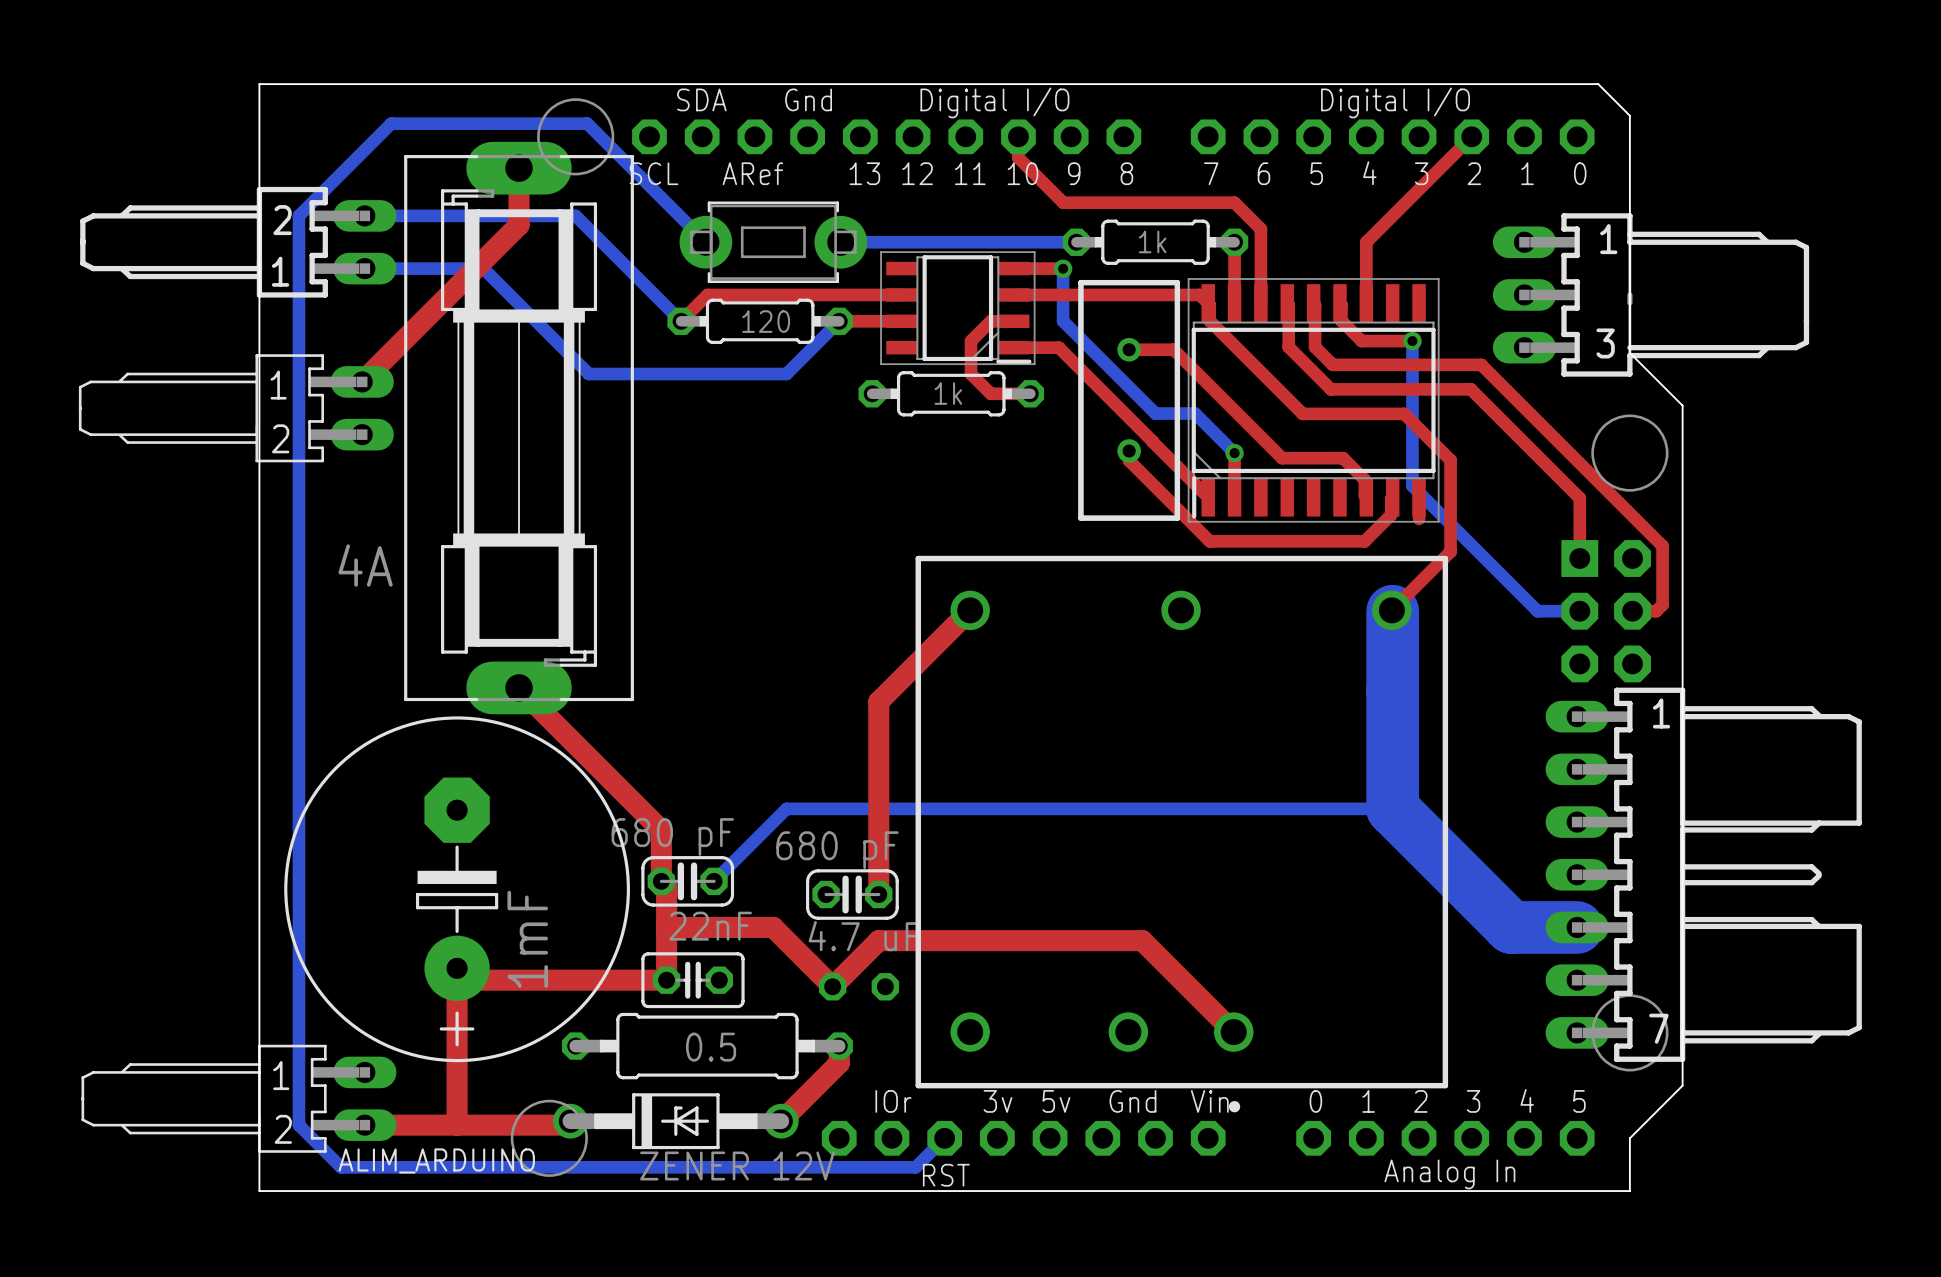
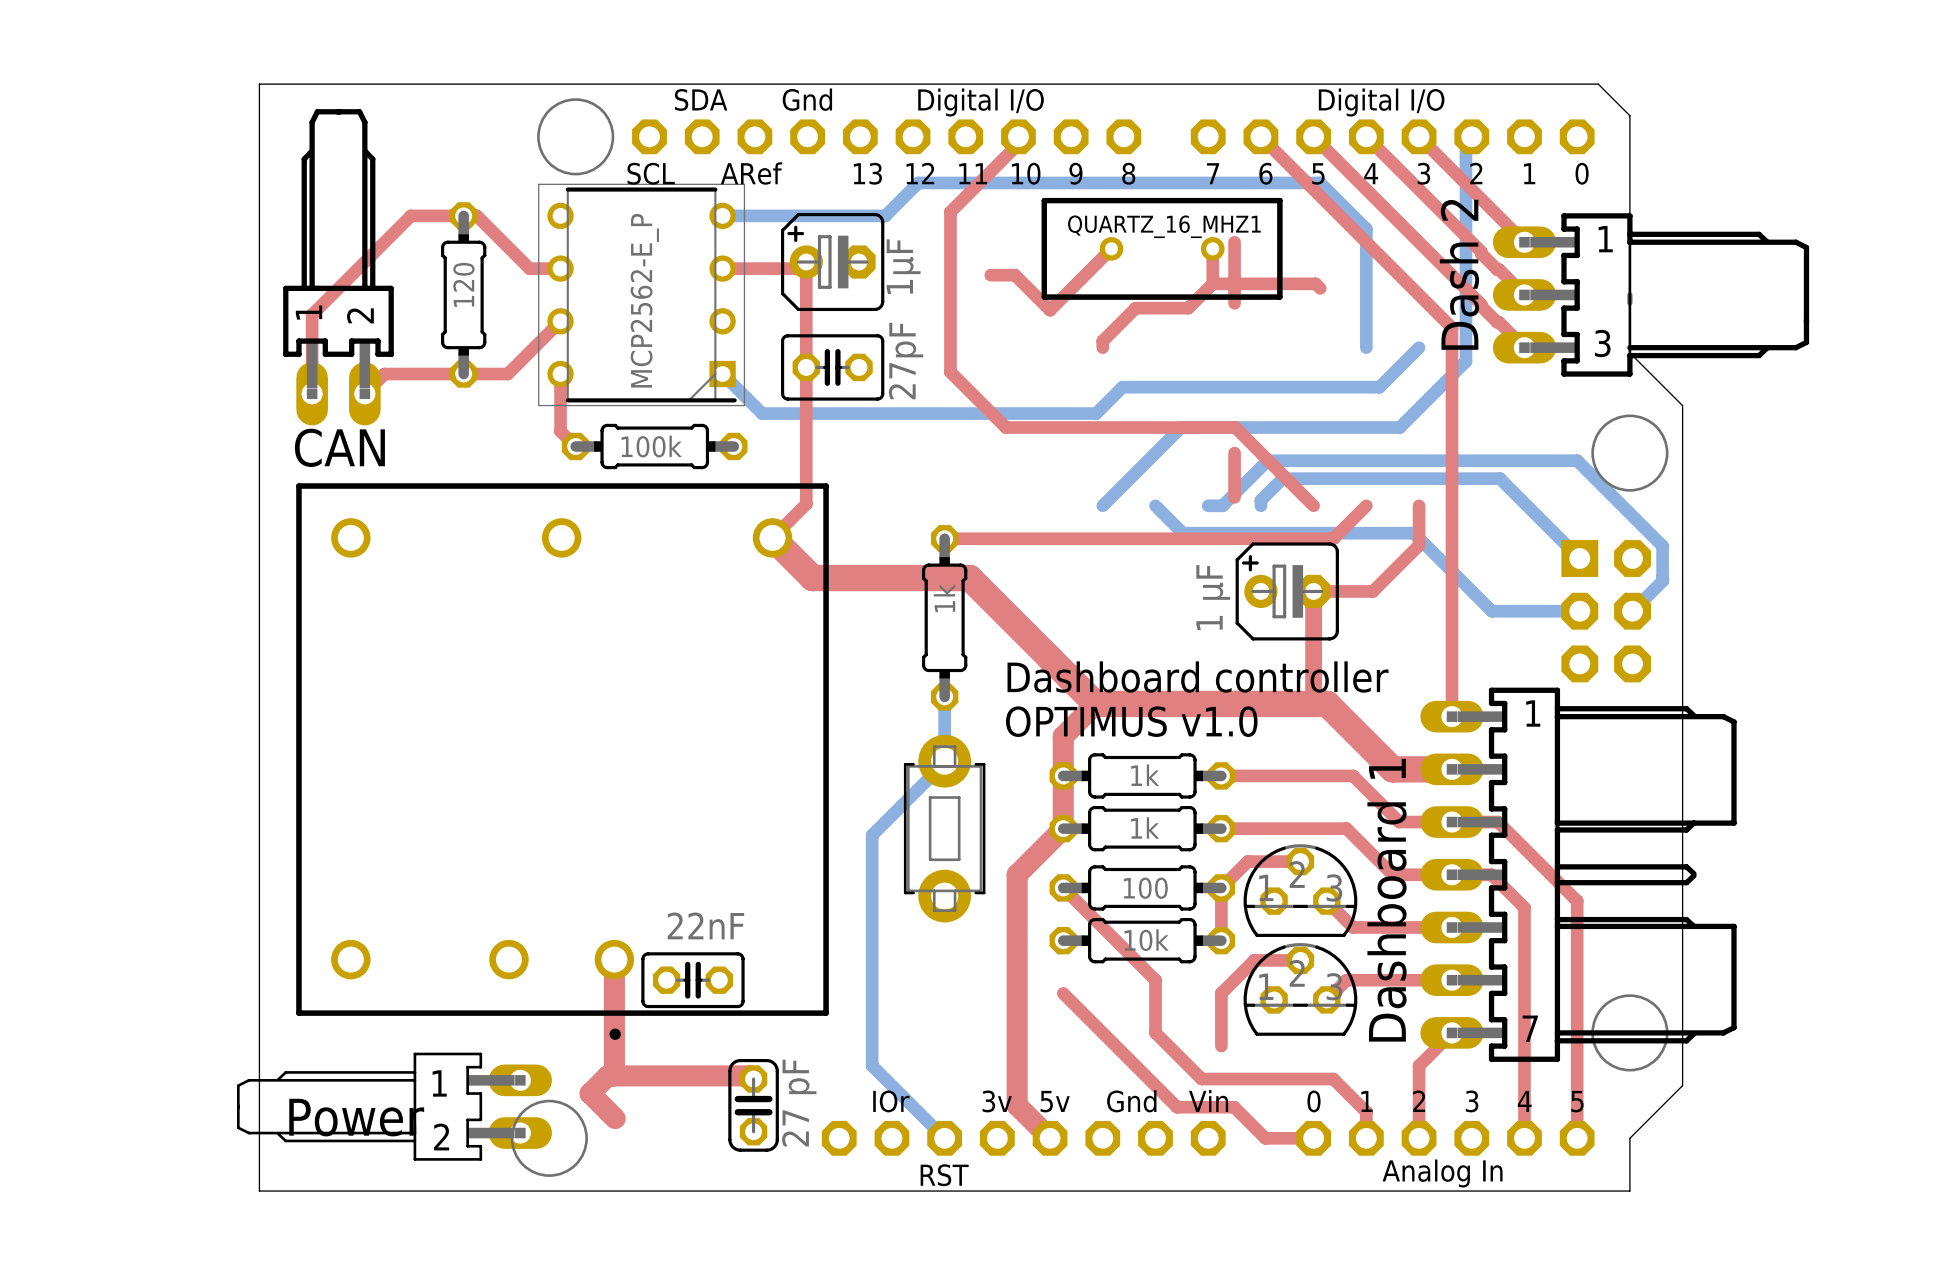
top track: none -> (1260, 136) (1452, 327) (1452, 716)
top track: none -> (1313, 136) (1524, 347)
top track: none -> (1366, 136) (1524, 294)
top track: none -> (1419, 136) (1524, 242)
top track: (1471, 136) (1366, 242) (1366, 303) -> none
bottom track: none -> (1471, 136) (1465, 142) (1465, 361) (1399, 427) (1181, 427) (1102, 505)
top track: (1018, 144) (1018, 157) (1063, 202) (1234, 202) (1260, 229) (1260, 303) -> (1018, 144) (950, 212) (950, 372) (1005, 427) (1235, 427) (1313, 505)
top track: (519, 168) (519, 225) (362, 381) -> none
bottom track: (364, 215) (575, 215) (681, 321) -> none
bottom track: none -> (722, 215) (885, 215) (918, 182) (1320, 182) (1366, 229) (1366, 347)
part: (238, 242) -> none
bottom track: (705, 242) (587, 123) (391, 123) (298, 215) (298, 1125) (341, 1167) (915, 1167) (944, 1138) -> (944, 696) (944, 762) (872, 835) (872, 1065) (944, 1138)
part: (773, 242) -> none
bottom track: (840, 242) (1076, 242) -> none
part: 1k (1155, 242) -> none
top track: none -> (1111, 248) (1050, 310) (1015, 275) (990, 275)
QUARTZ_16_MHZ1: none -> (1162, 248)
top track: none -> (1212, 248) (1212, 283)
part: none -> 1µF (832, 262)
text: none -> Dash 2 (1459, 274)
part: none -> (338, 267)
bottom track: (364, 268) (483, 268) (588, 374) (786, 374) (839, 321) -> none
top track: none -> (560, 268) (529, 268) (476, 215) (410, 215) (312, 314) (312, 393)
top track: none -> (722, 268) (799, 268) (806, 262) (806, 504) (772, 537) (812, 578) (969, 578) (1095, 703)
top track: (1013, 268) (1062, 268) -> none
bottom track: (1063, 268) (1063, 321) (1155, 413) (1195, 413) (1234, 453) -> none
via: (1063, 268) -> none
top track: none -> (1212, 283) (1188, 308) (1135, 308) (1102, 341) (1102, 347)
top track: none -> (1212, 283) (1315, 283) (1320, 288)
part: none -> MCP2562-E_P (641, 294)
top track: (901, 294) (707, 294) (681, 321) -> none
top track: (1013, 294) (1199, 294) (1209, 304) (1209, 320) (1302, 413) (1404, 413) (1450, 460) (1450, 551) (1391, 610) -> none
top track: (1287, 303) (1288, 347) (1330, 389) (1470, 389) (1579, 498) (1579, 558) -> none
top track: (1313, 303) (1315, 347) (1332, 364) (1481, 364) (1662, 546) (1662, 604) (1656, 611) (1632, 611) -> none
top track: (1339, 303) (1341, 320) (1361, 341) (1412, 341) -> none
part: (957, 308) -> none
top track: none -> (560, 321) (507, 374) (384, 374) (364, 393)
part rotation: 0° (760, 321) -> 90° clockwise (463, 294)
part position: (760, 321) -> (463, 294)
top track: (839, 321) (901, 321) -> none
top track: (1013, 321) (990, 321) (971, 341) (971, 374) (990, 393) (1030, 393) -> none
bottom track: (1412, 341) (1412, 486) (1537, 611) -> (1155, 505) (1182, 533) (1413, 533) (1491, 611) (1537, 611)
via: (1412, 341) -> none
top track: (1013, 347) (1058, 347) (1152, 441) -> none
bottom track: none -> (1419, 347) (1379, 387) (1122, 387) (1096, 413) (762, 413) (722, 374)
top track: (1129, 349) (1173, 349) (1282, 458) (1343, 458) (1364, 479) (1366, 497) -> none
part: none -> 27pF (832, 367)
top track: none -> (560, 374) (560, 431) (575, 446)
part: 1k (951, 393) -> none
part: (1129, 400) -> none
part: (1313, 400) -> none
part: (236, 408) -> none
part: 4A (519, 428) -> none
top track: (1152, 441) (1208, 497) -> none
part: none -> 100k (654, 446)
text: none -> CAN (339, 447)
top track: (1129, 451) (1129, 460) (1209, 541) (1364, 541) (1391, 514) (1392, 497) -> none
via: (1234, 453) -> none
bottom track: none -> (1208, 505) (1222, 505) (1267, 460) (1577, 460) (1662, 546) (1662, 578)
bottom track: none -> (1260, 505) (1260, 500) (1282, 478) (1499, 478) (1579, 558)
top track: none -> (1366, 505) (1333, 538) (944, 538)
top track: none -> (1419, 518) (1419, 545) (1372, 591) (1313, 591) (1313, 703)
bottom track: none -> (1662, 578) (1662, 580) (1632, 611)
part: none -> 1 µF (1287, 591)
top track: (970, 610) (878, 701) (878, 894) -> none
bottom track: (1392, 611) (1392, 808) -> none
part: none -> 1k (944, 617)
text: none -> Dashboard controller (1198, 677)
top track: (519, 687) (661, 830) (661, 881) (666, 886) (666, 980) (468, 980) (457, 968) (457, 1125) -> none
top track: none -> (1095, 703) (1063, 736) (1063, 828) (1017, 874) (1017, 1105) (1050, 1138)
top track: none -> (1095, 703) (1327, 703) (1392, 769) (1452, 769)
text: none -> OPTIMUS v1.0 (1131, 721)
part: none -> (562, 761)
part: none -> 1k (1142, 775)
top track: none -> (1221, 775) (1353, 775) (1399, 822) (1498, 822) (1577, 901) (1577, 1138)
bottom track: (1392, 808) (786, 808) (714, 881) -> none
bottom track: (1392, 808) (1511, 927) (1577, 927) -> none
part: none -> (944, 828)
part: none -> 1k (1142, 828)
top track: none -> (1221, 828) (1346, 828) (1392, 874) (1491, 874) (1524, 907) (1524, 1138)
part: (1181, 834) -> none
top track: none -> (1300, 861) (1247, 861) (1221, 887) (1221, 940)
part position: (1703, 874) -> (1578, 874)
part: 680 pF (687, 881) -> none
text: none -> Dashboard 1 (1387, 900)
top track: none -> (1063, 887) (1155, 980) (1155, 1032) (1201, 1079) (1333, 1079) (1366, 1111) (1366, 1138)
part: none -> 100 (1142, 887)
part: 1mF (457, 889) -> none
part: none -> (1300, 890)
part: 680 pF (852, 894) -> none
top track: none -> (1326, 901) (1353, 927) (1452, 927)
top track: (666, 927) (773, 927) (832, 986) (878, 940) (1142, 940) (1233, 1032) -> none
part value: 4.7 uF (864, 936) -> 27 pF (799, 1103)
part: none -> 10k (1142, 940)
top track: none -> (614, 959) (614, 1075)
top track: none -> (1300, 960) (1254, 960) (1221, 993) (1221, 1046)
top track: none -> (1452, 980) (1346, 980) (1326, 999)
part side: bottom (859, 986) -> top (753, 1105)
part: none -> (1300, 989)
top track: none -> (1063, 993) (1177, 1107) (1234, 1107) (1265, 1138) (1313, 1138)
top track: none -> (1452, 1032) (1419, 1065) (1419, 1138)
part: 0.5 (707, 1046) -> none
top track: (839, 1046) (839, 1063) (781, 1121) -> none
top track: none -> (753, 1079) (750, 1075) (607, 1075) (590, 1093) (615, 1118)
ALIM_ARDUINO: (239, 1098) -> none
part: none -> (394, 1106)
text: none -> Power (356, 1117)
top track: (570, 1121) (566, 1125) (364, 1125) -> none
part: ZENER 12V (675, 1121) -> none

